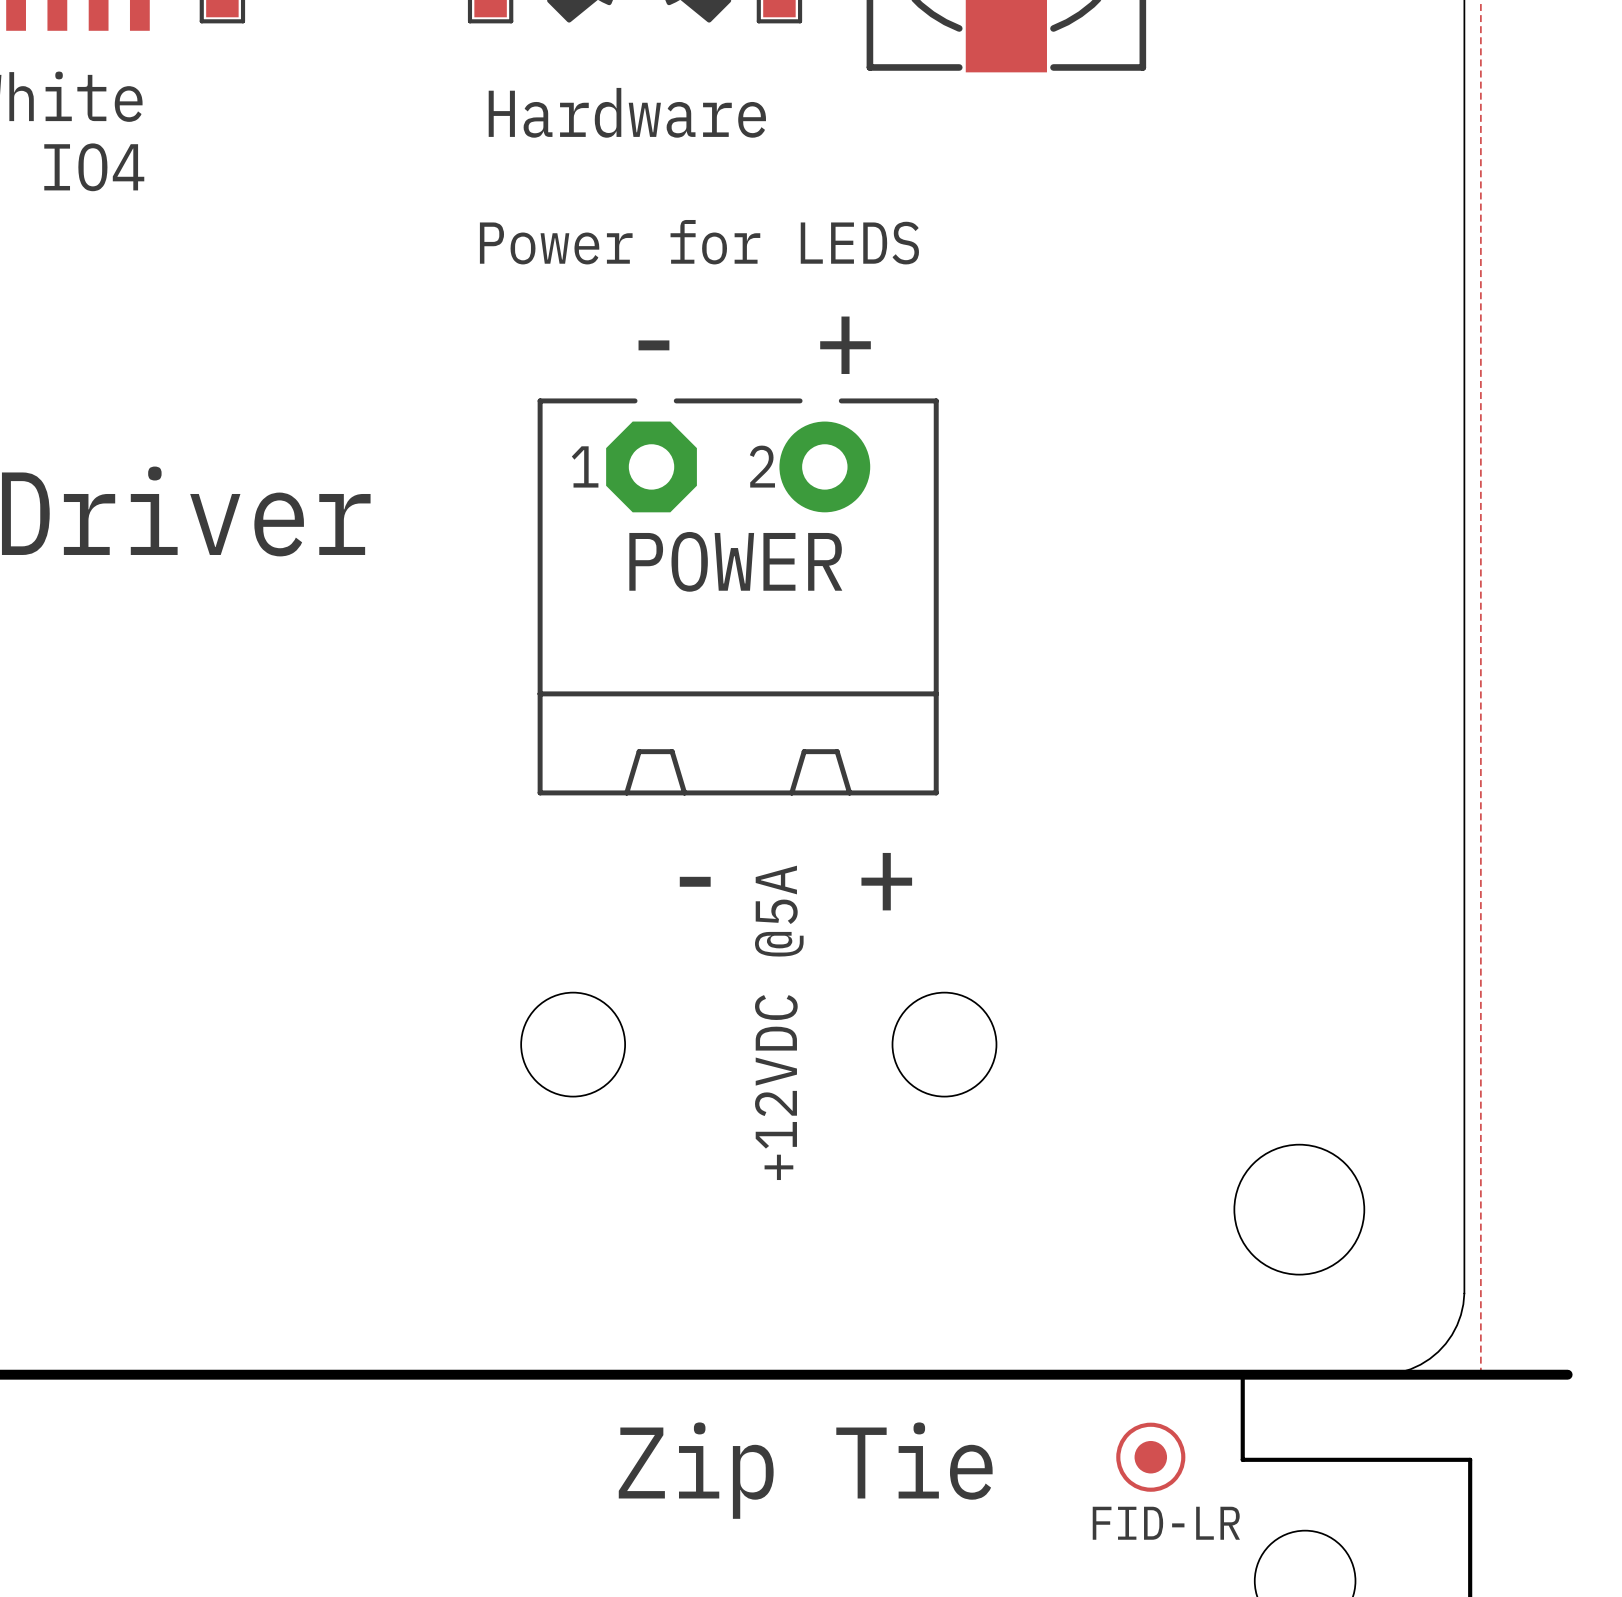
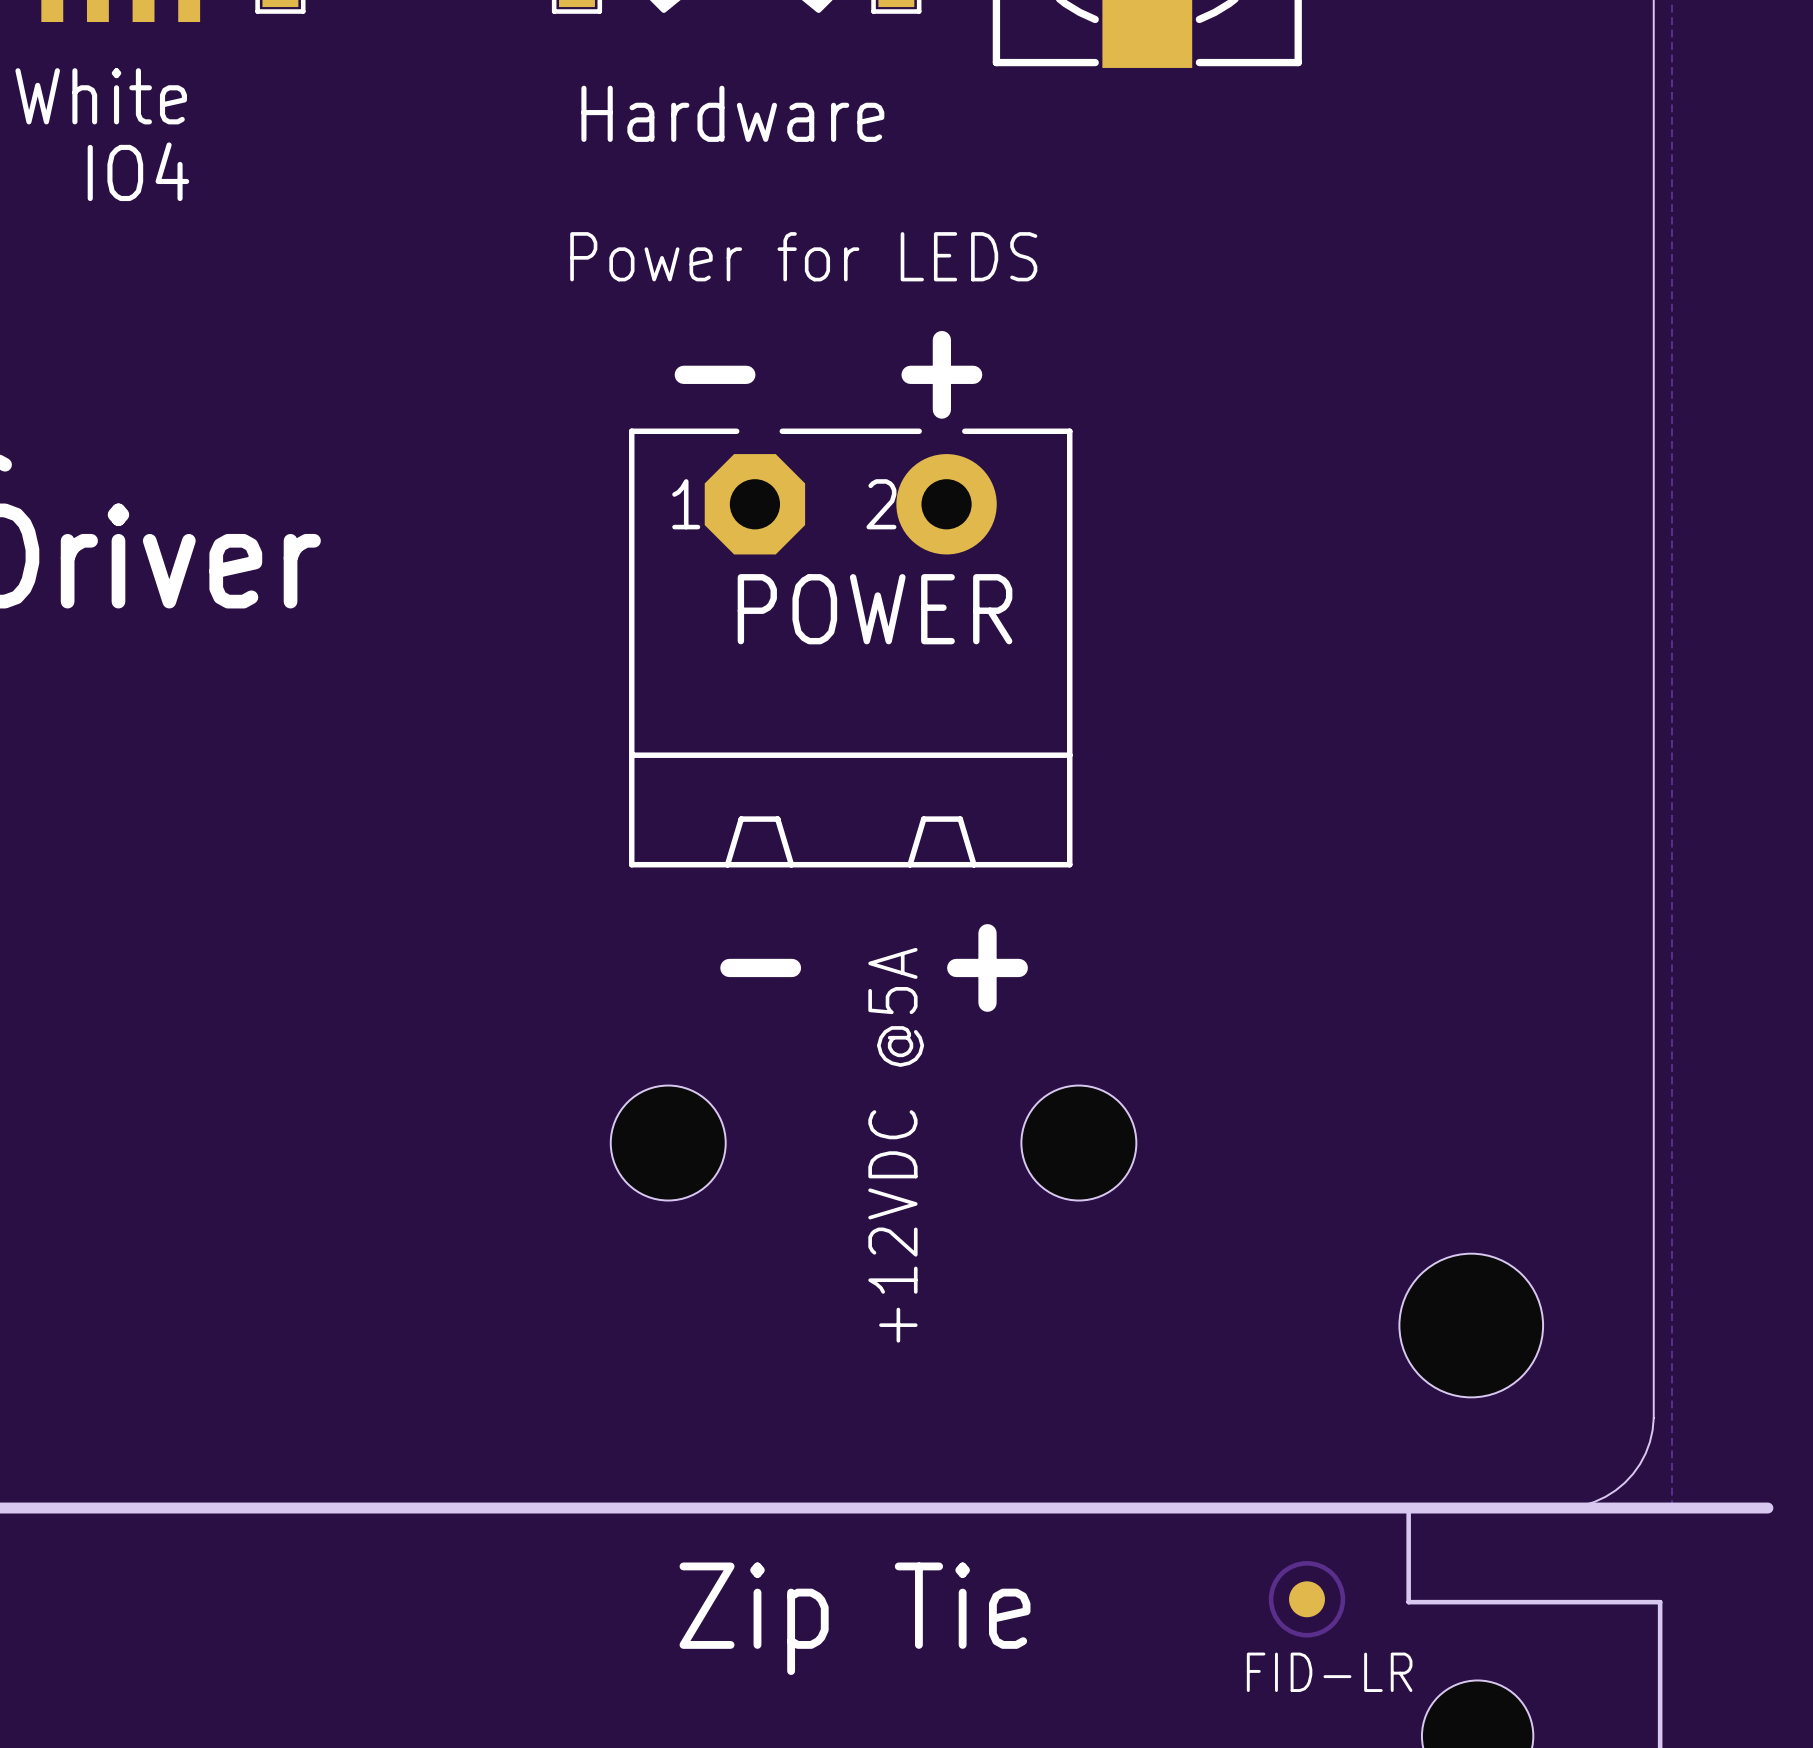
text position: Zip Tie (805, 1470) -> Zip Tie (855, 1618)

